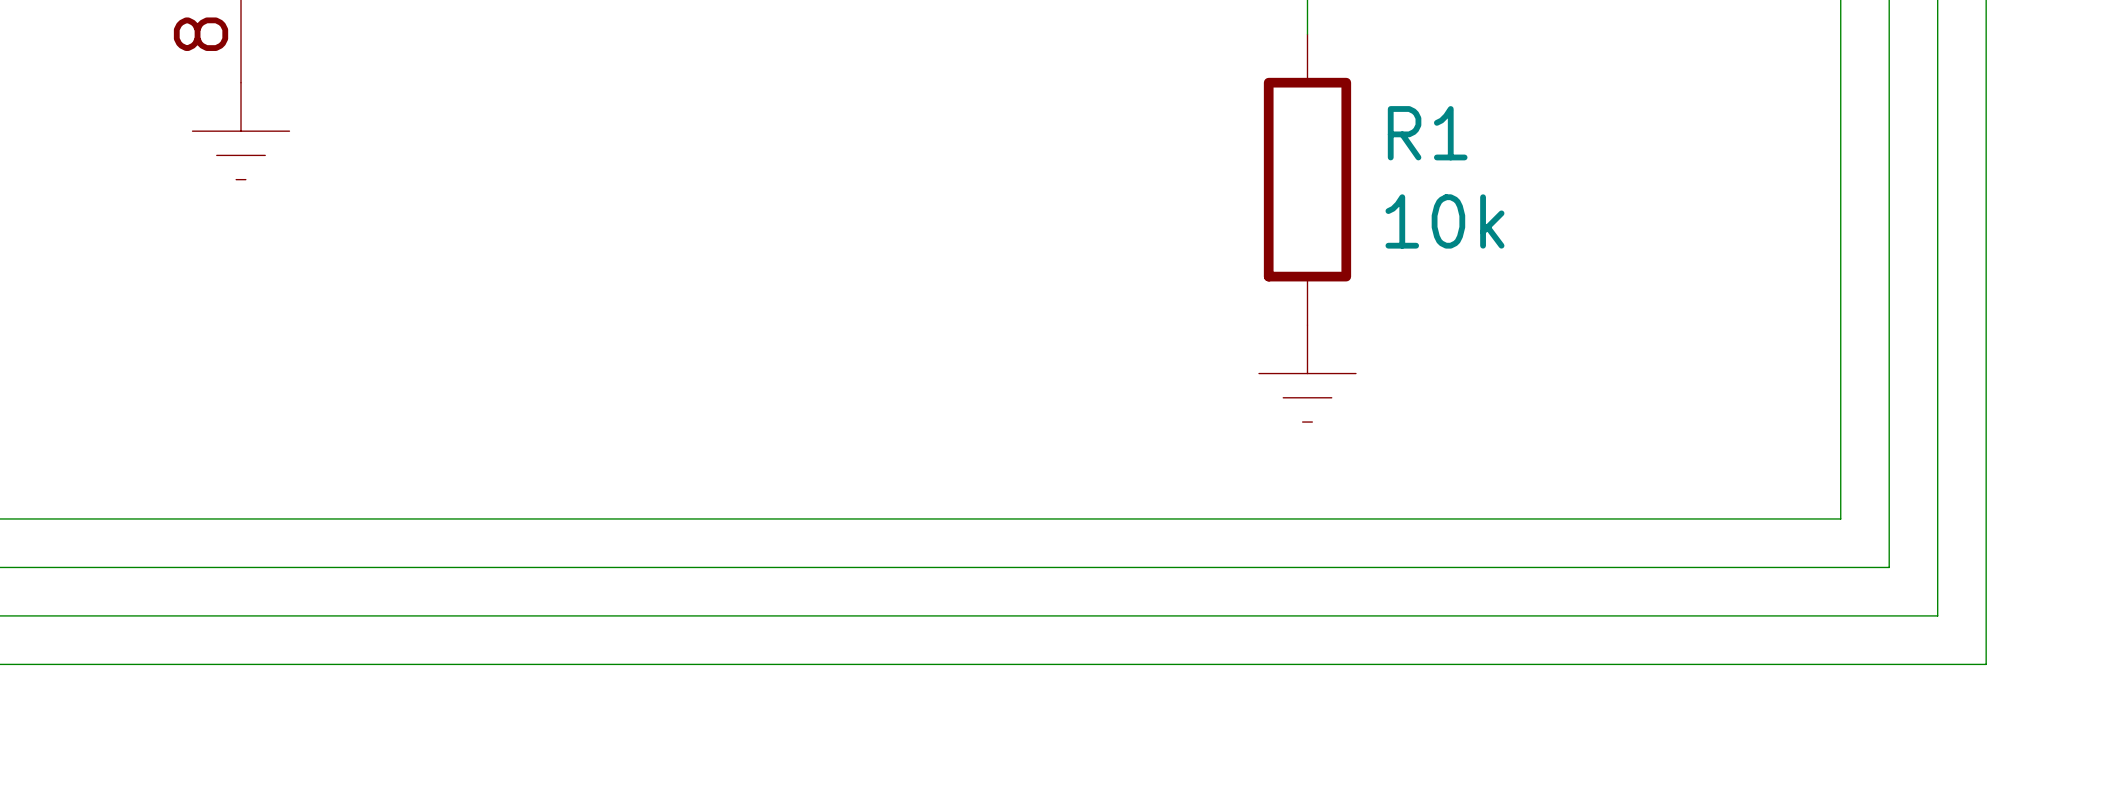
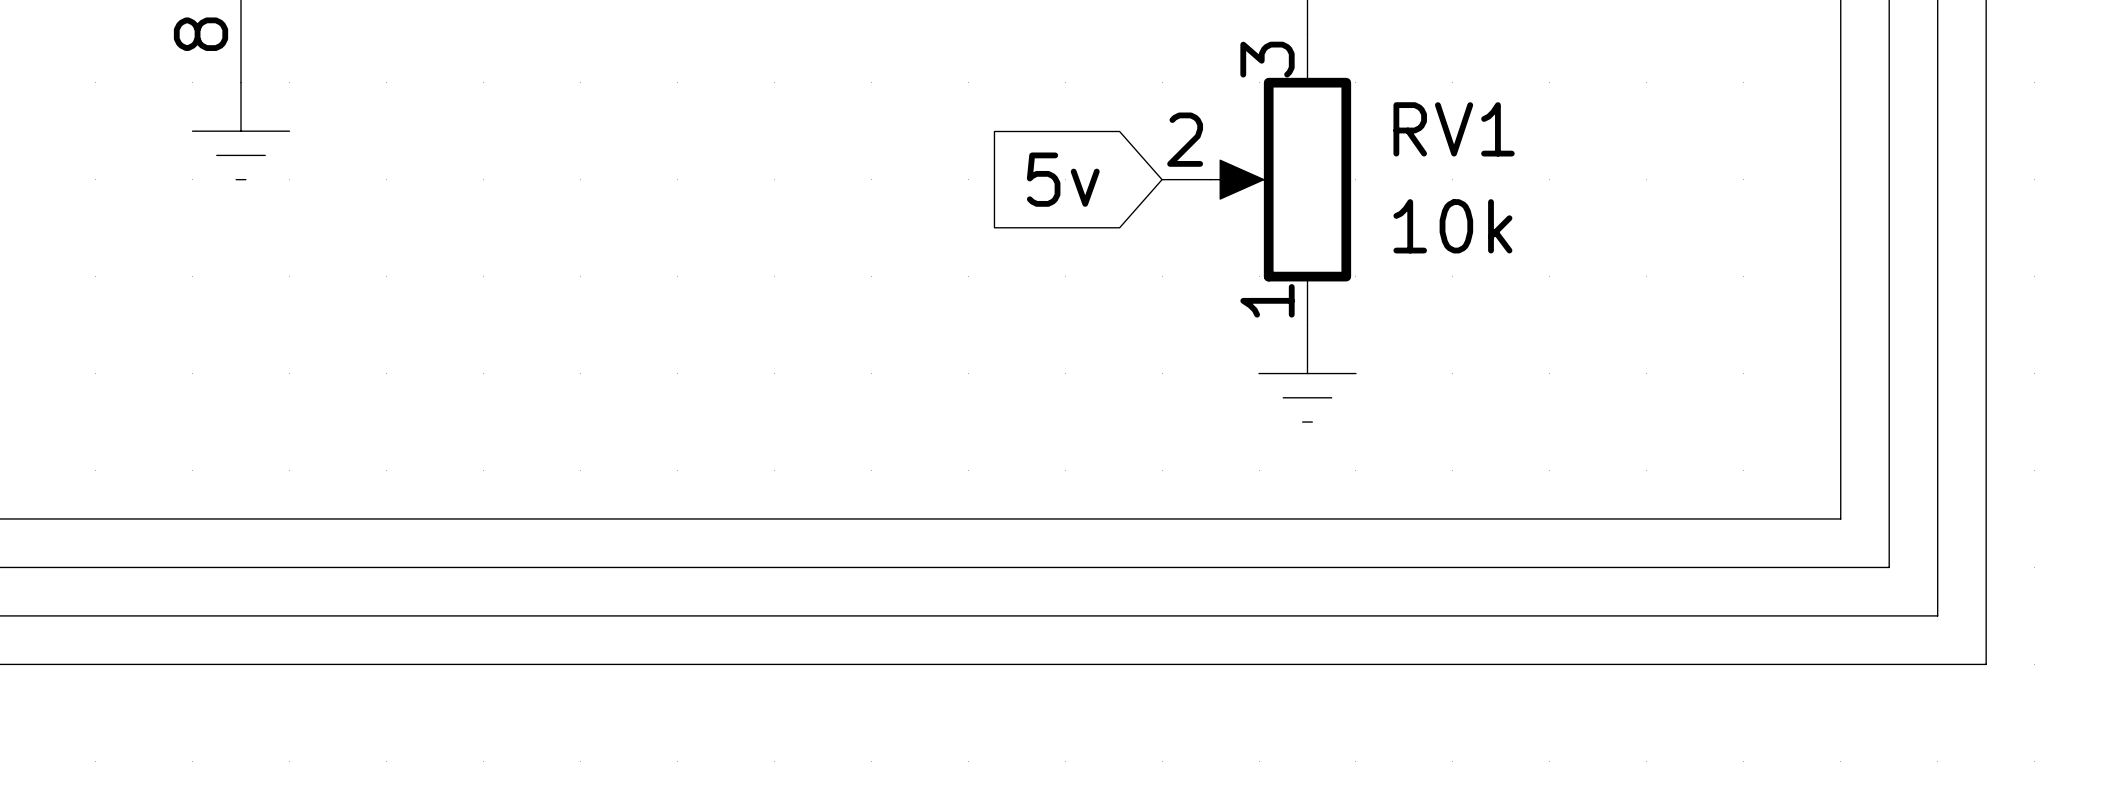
global label: none -> 5v (1063, 179)
RV1: none -> 10k (1256, 179)
R1: 10k (1307, 179) -> none

